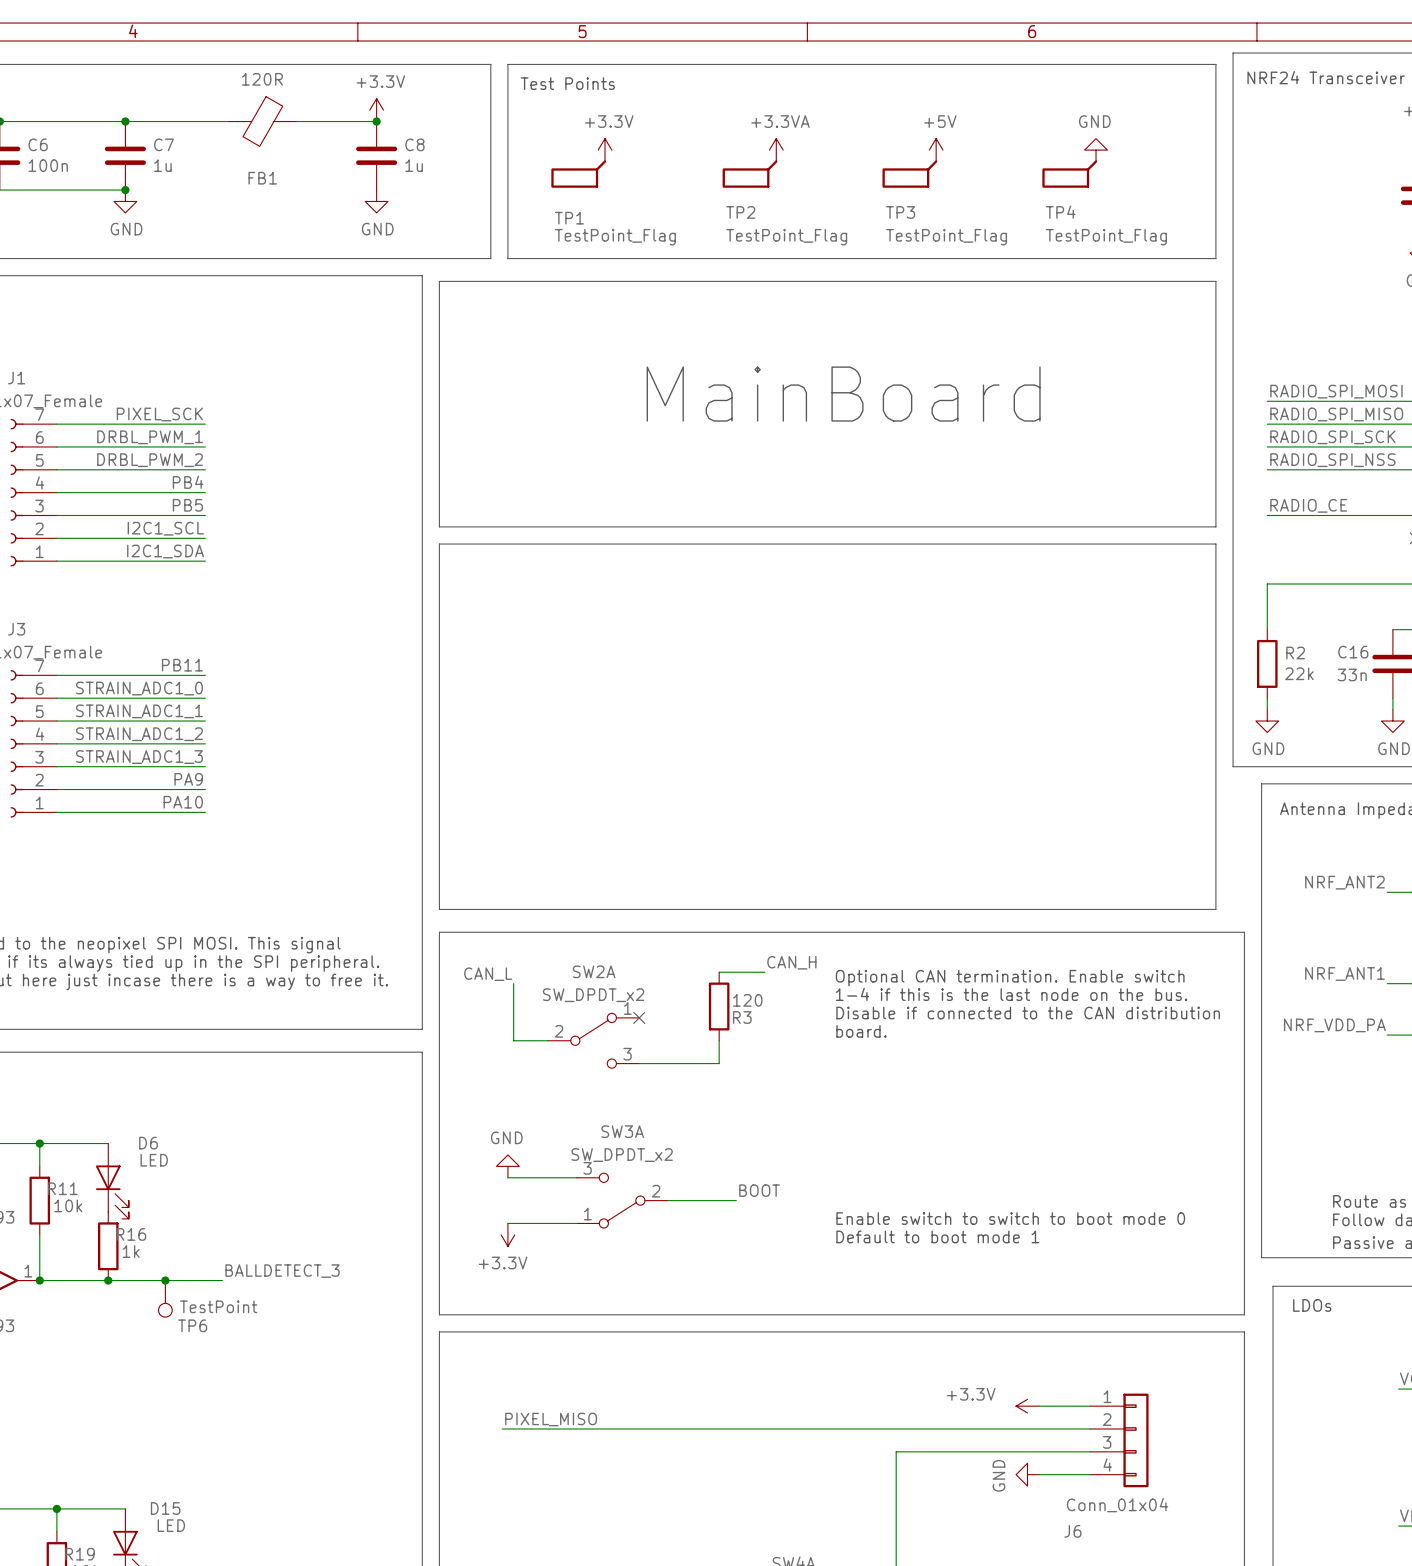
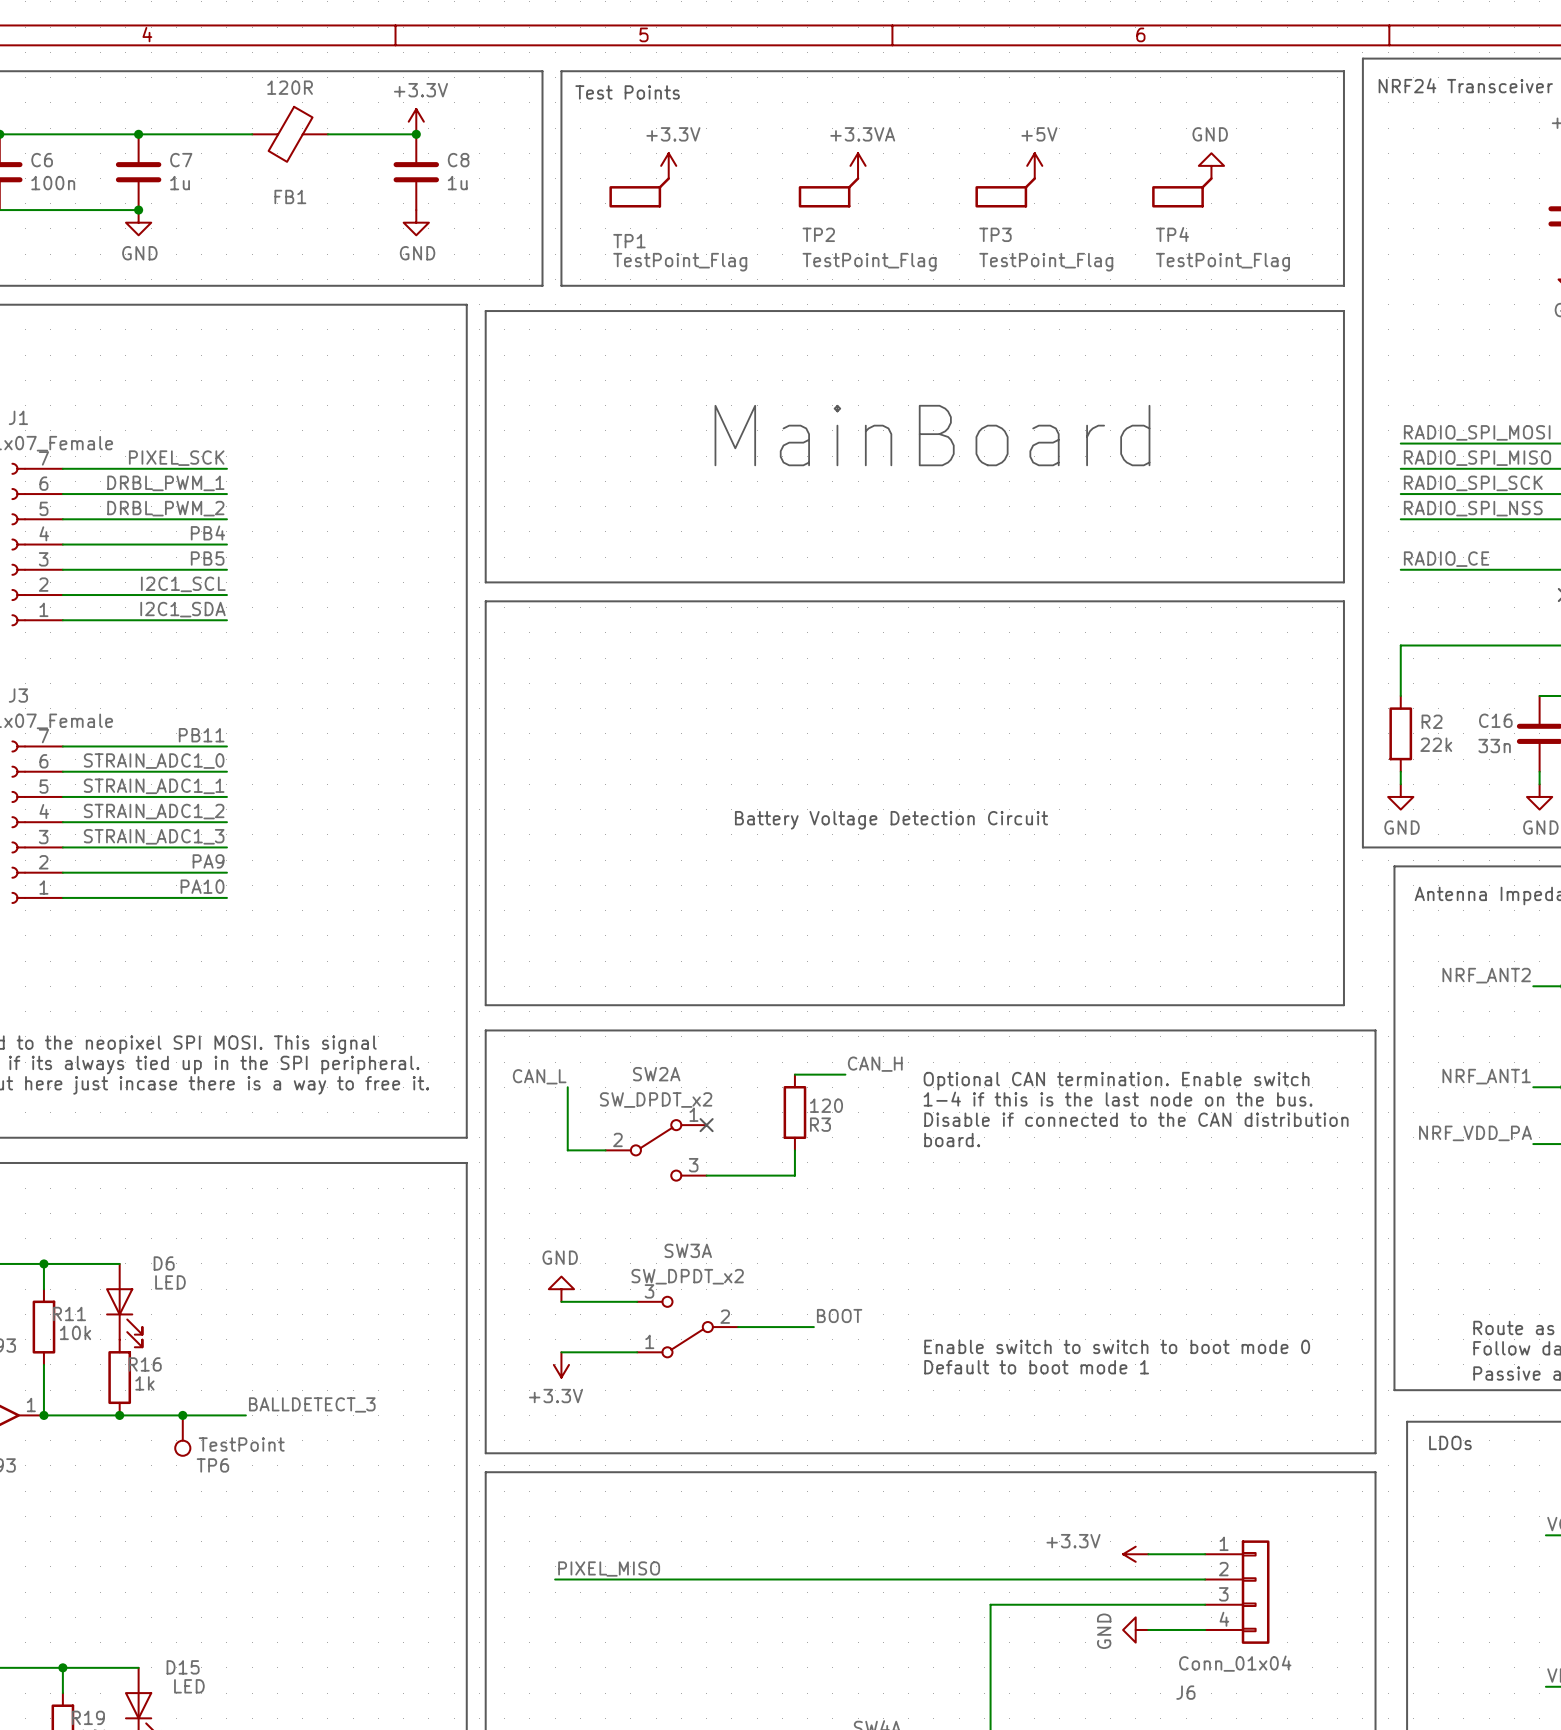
text: none -> Battery Voltage Detection Circuit (891, 820)

